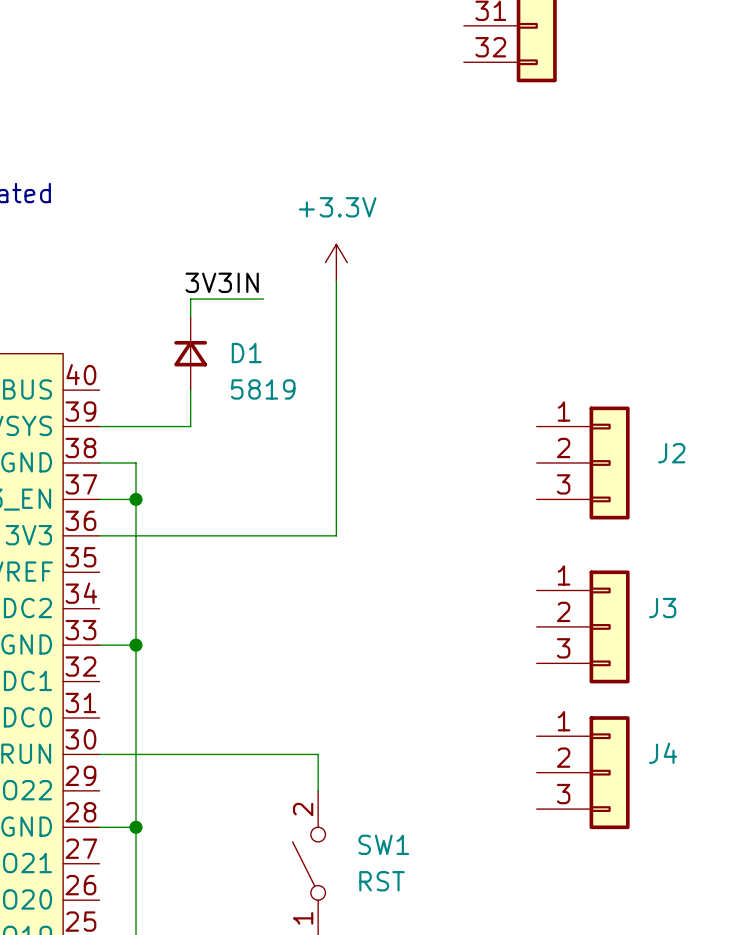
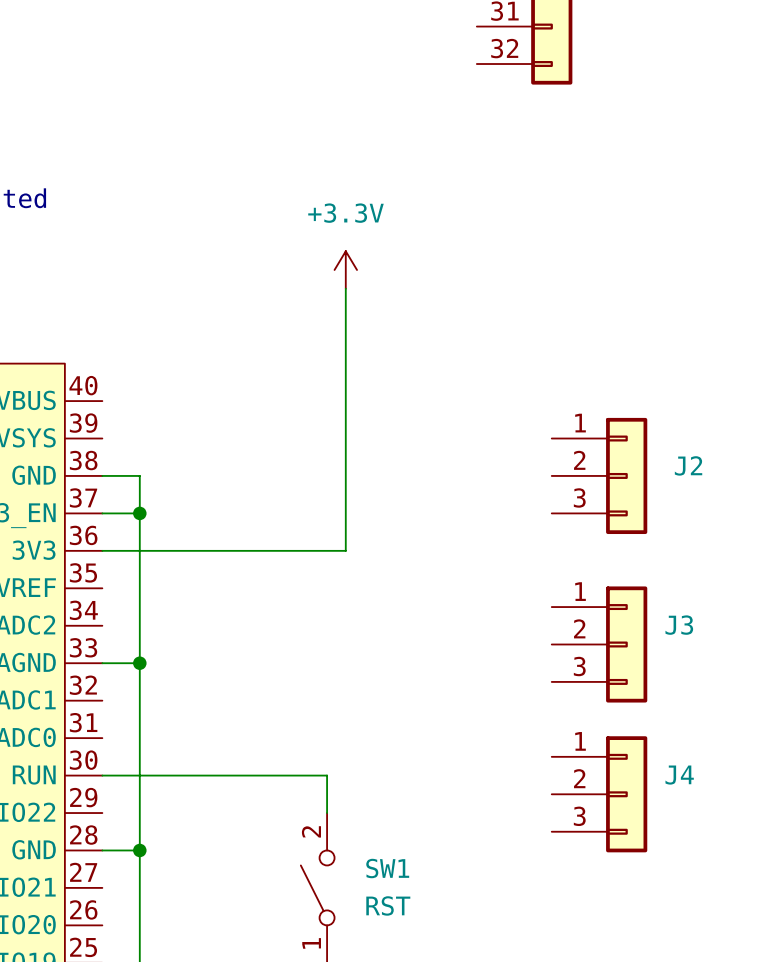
label: 3V3IN (222, 282) -> none
wire: (263, 299) (190, 299) (190, 317) -> none
D1: 5819 (190, 353) -> none
wire: (190, 390) (190, 426) (99, 426) -> none

